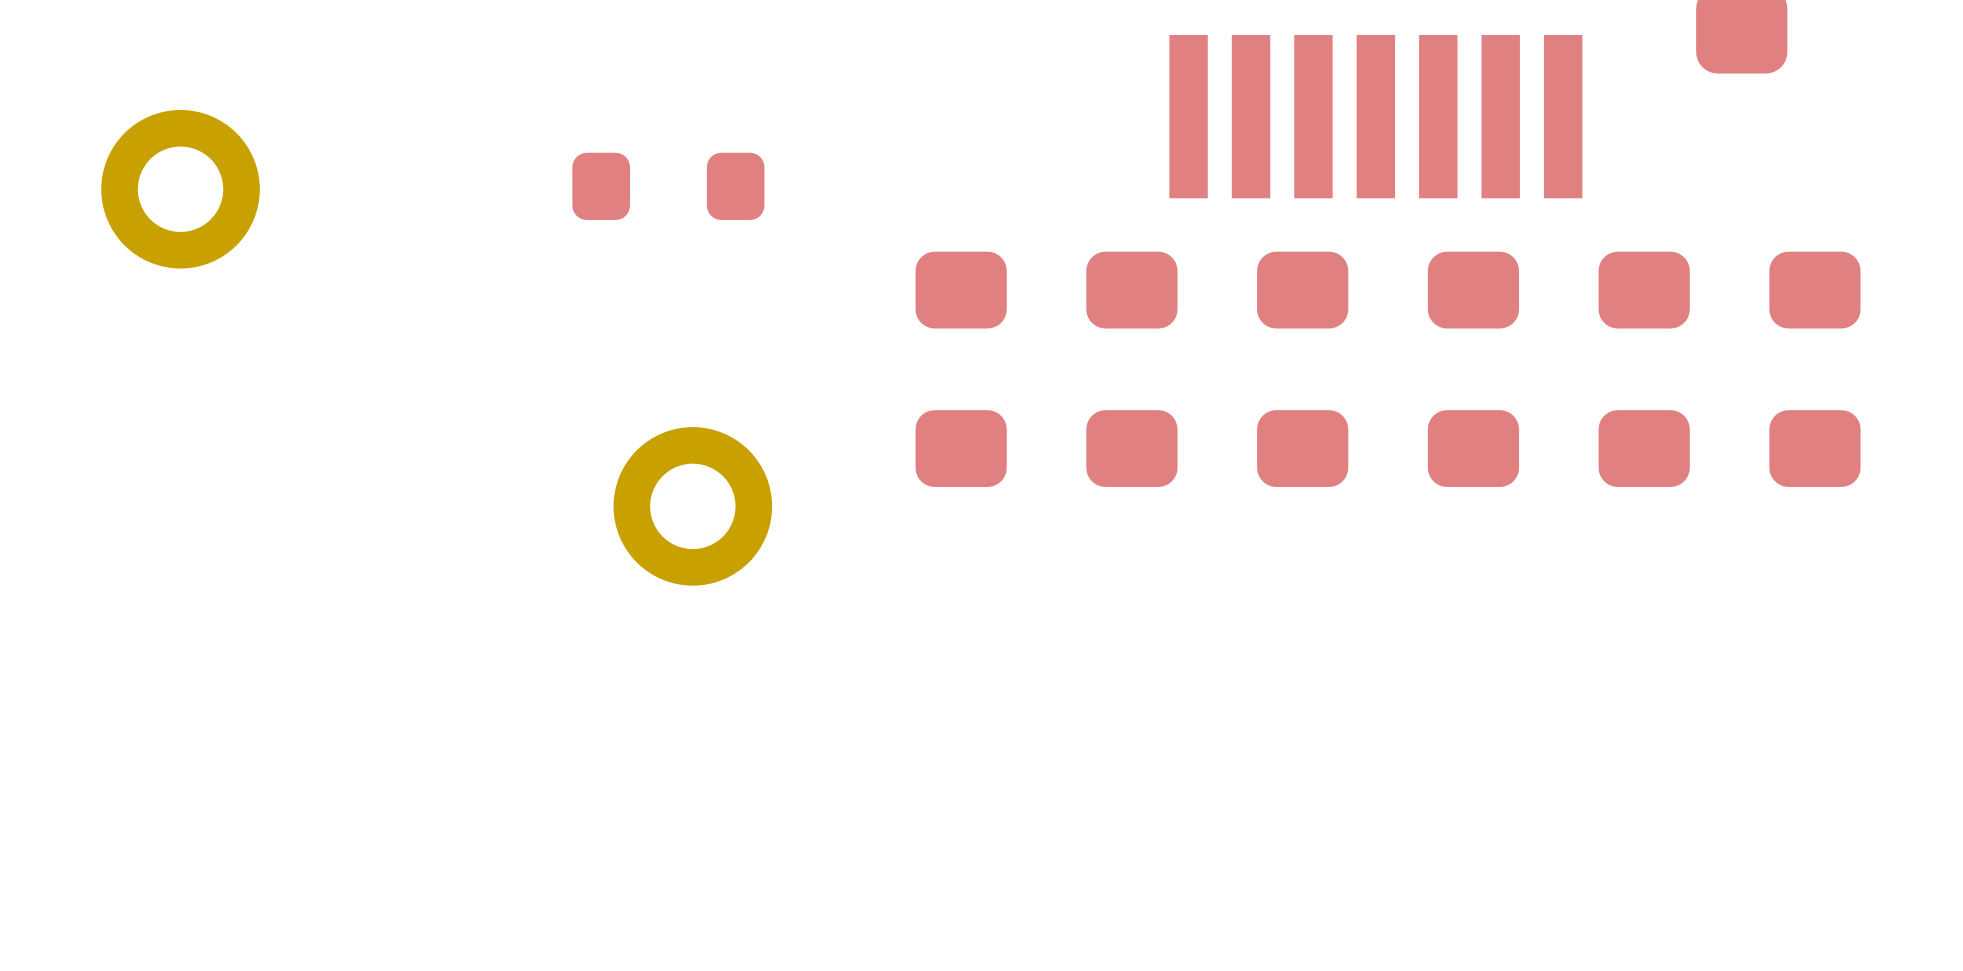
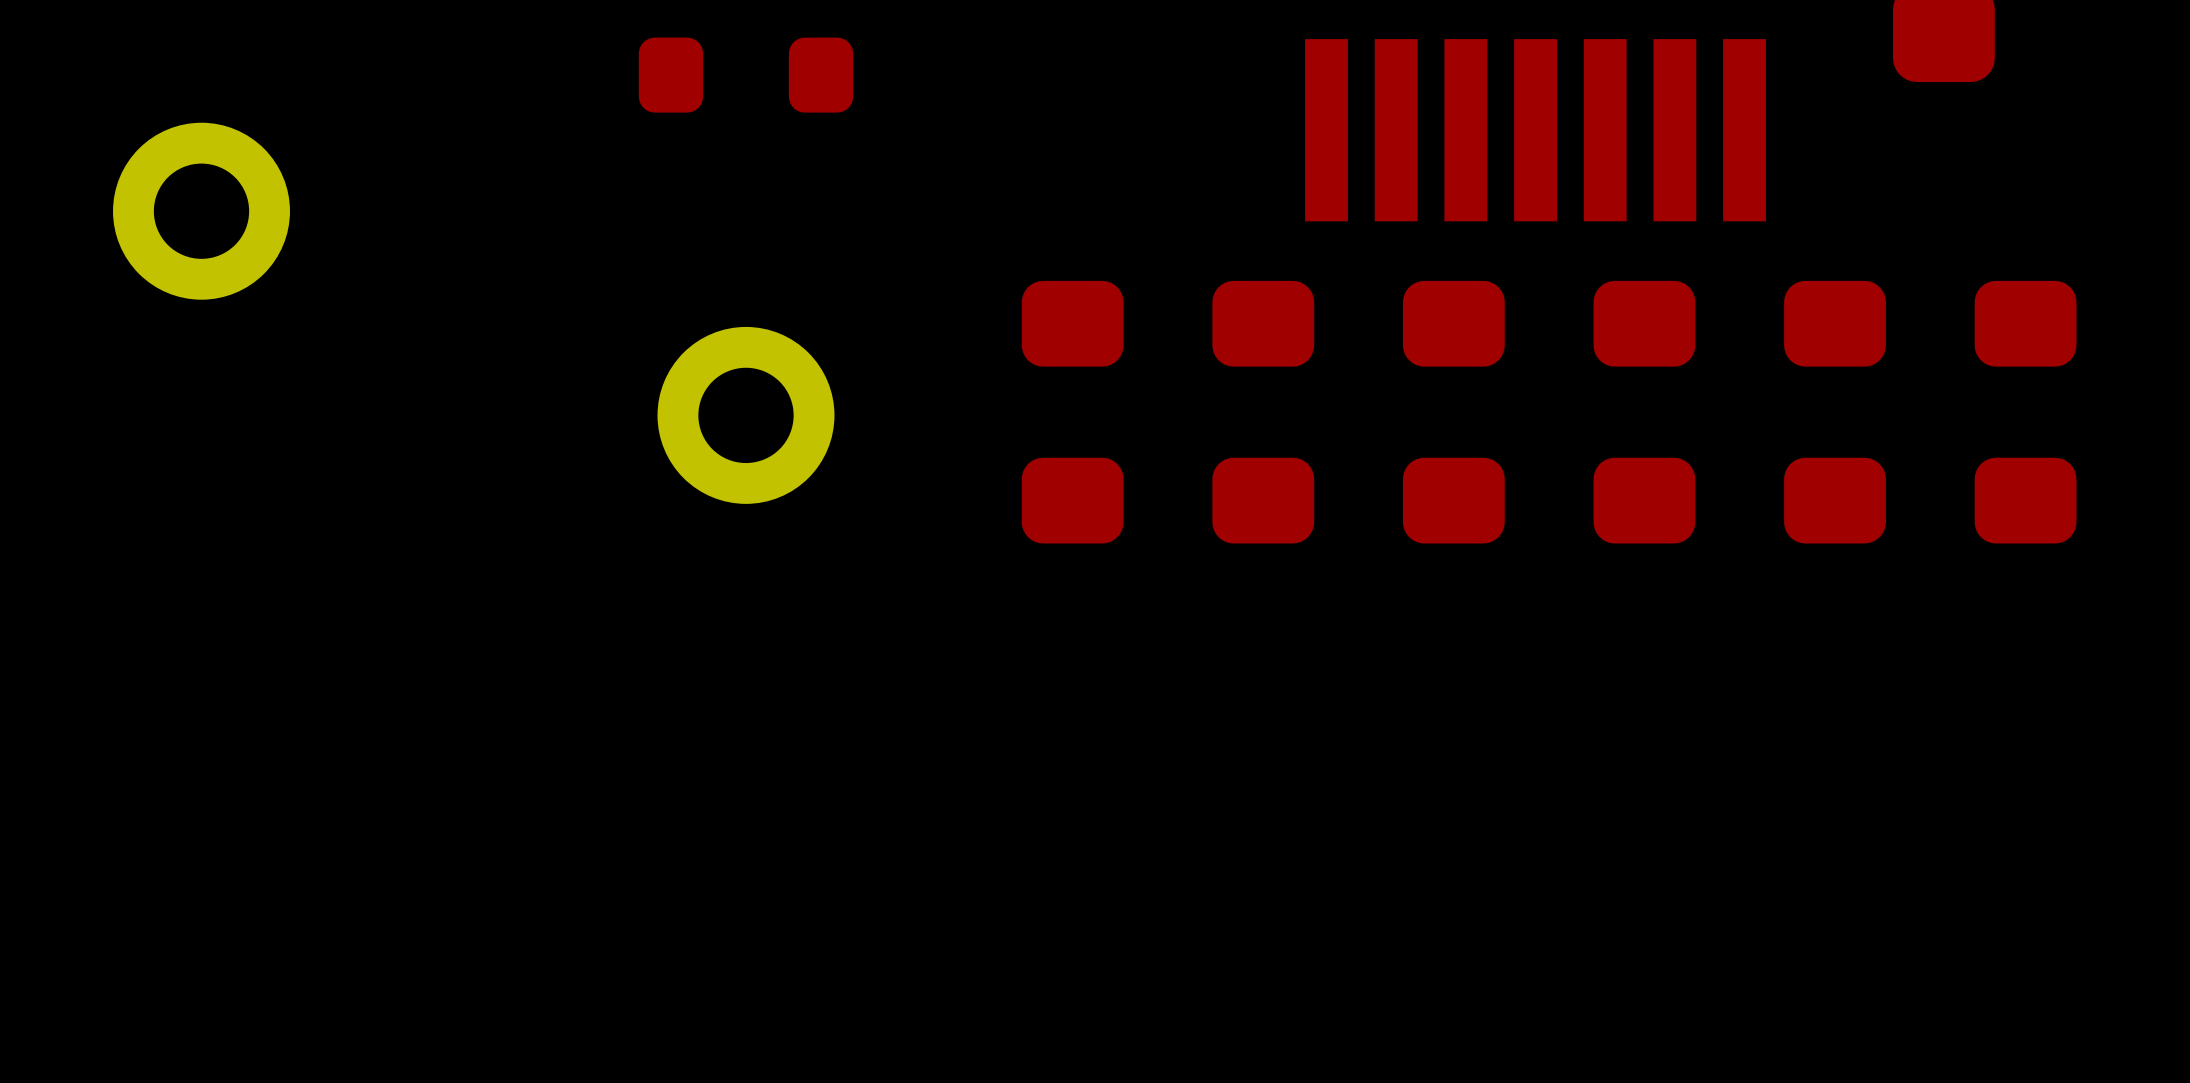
part position: (668, 186) -> (745, 75)
part position: (692, 506) -> (745, 415)

